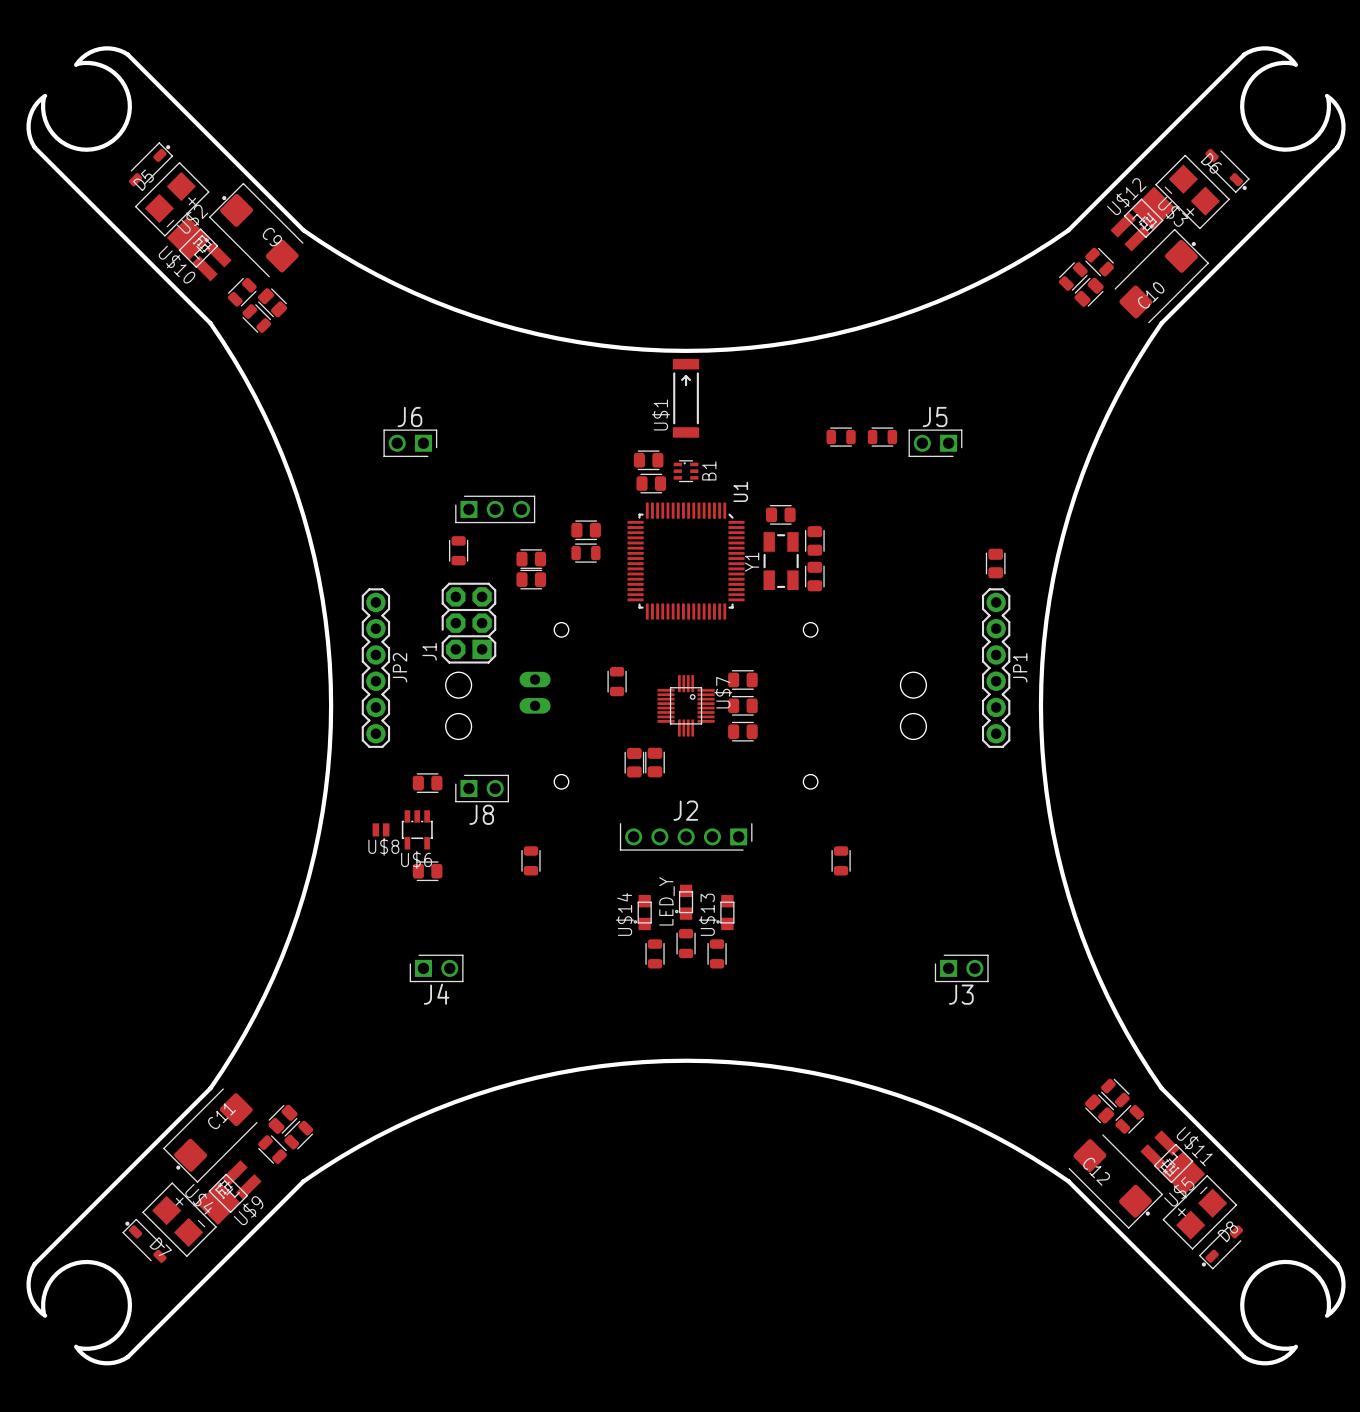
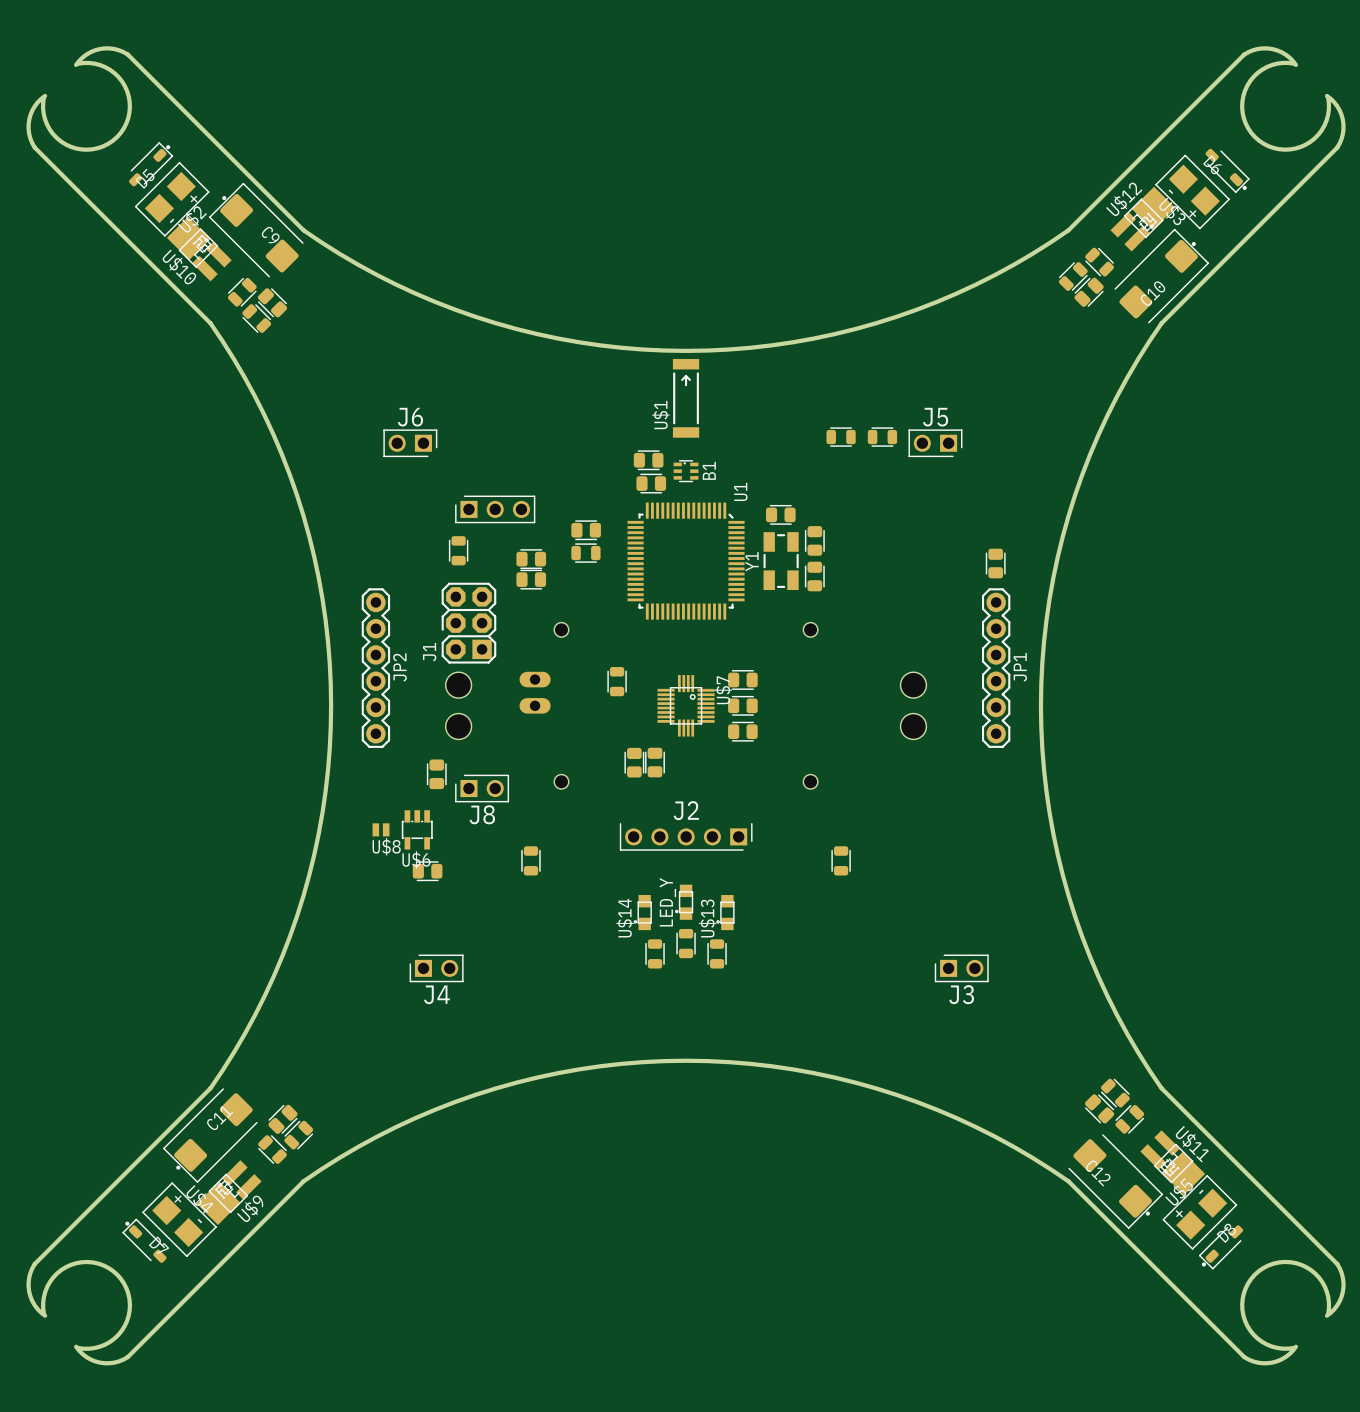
part rotation: 0° (427, 783) -> 90° clockwise (436, 774)

